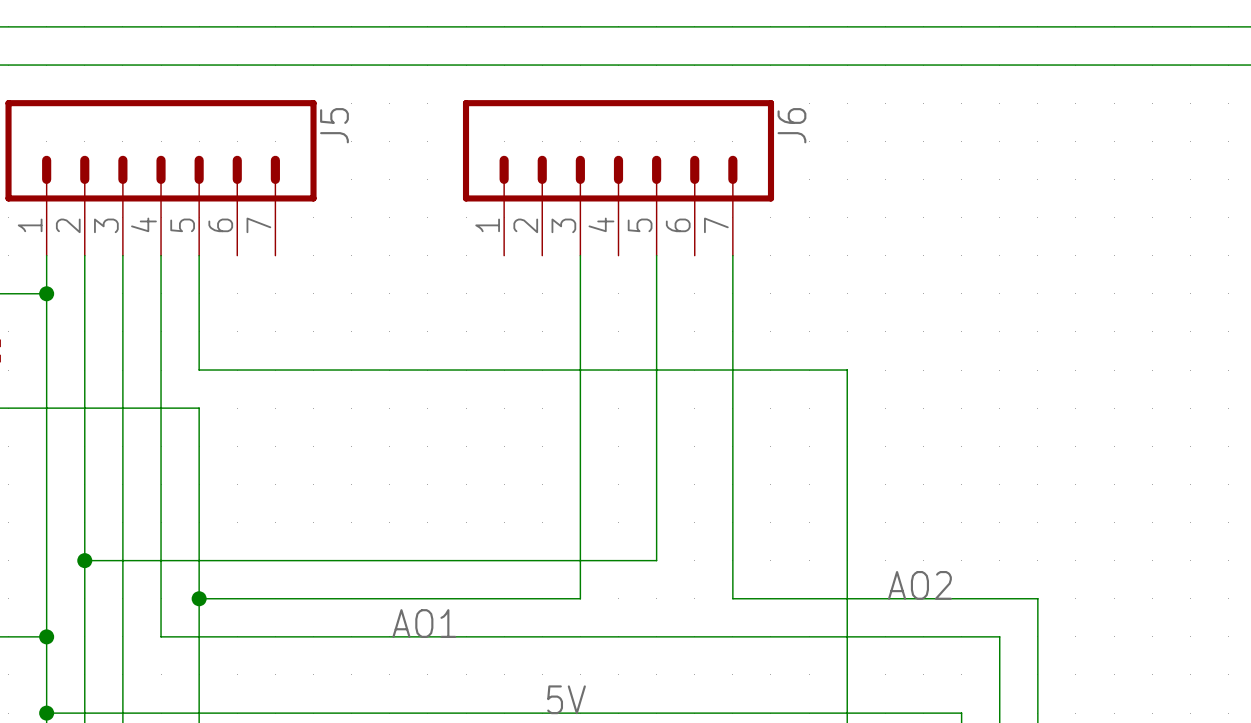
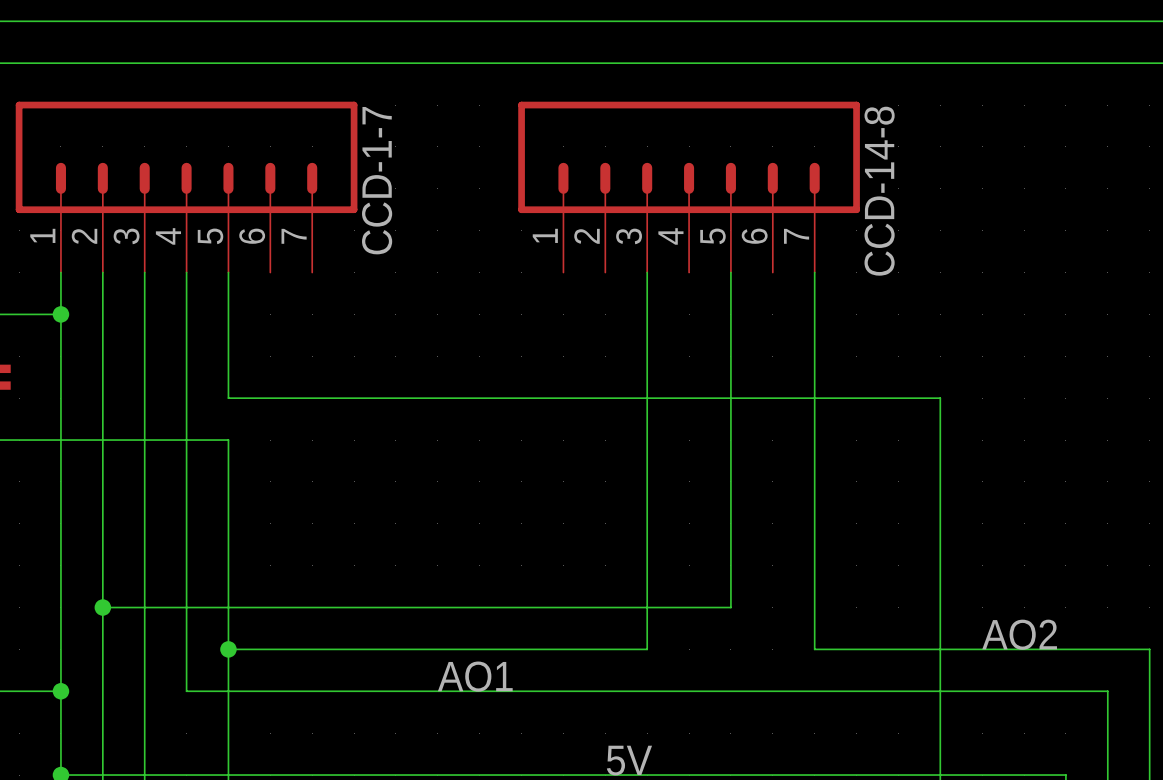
J5 name: J5 (334, 125) -> CCD-1-7 (377, 180)
J6 name: J6 (791, 125) -> CCD-14-8 (879, 191)

